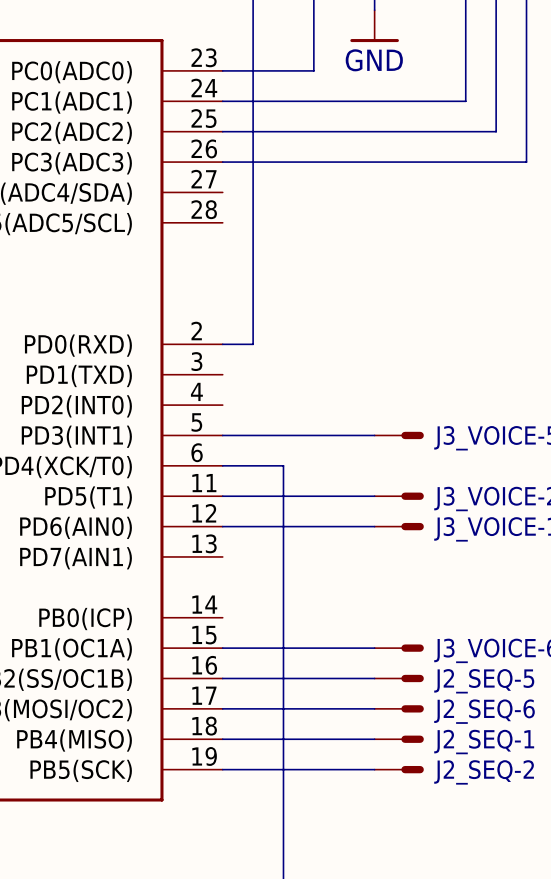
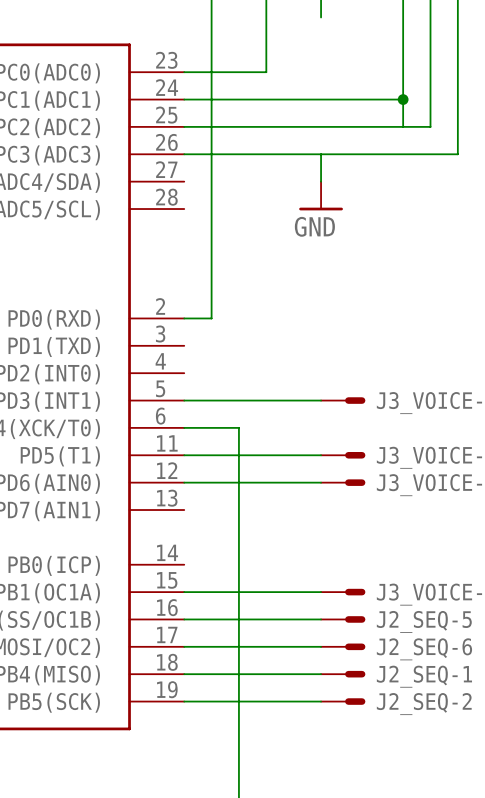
power symbol: GND (374, 26) -> none
wire: none -> (403, 99) (403, 126)
junction: none -> (403, 99)
wire: none -> (321, 154) (321, 181)
power symbol: none -> GND (321, 196)

